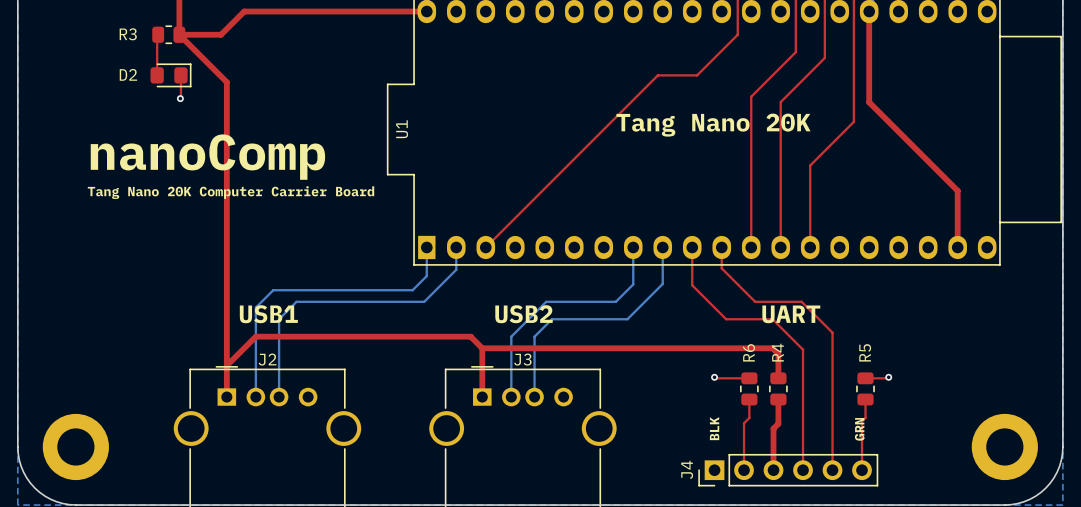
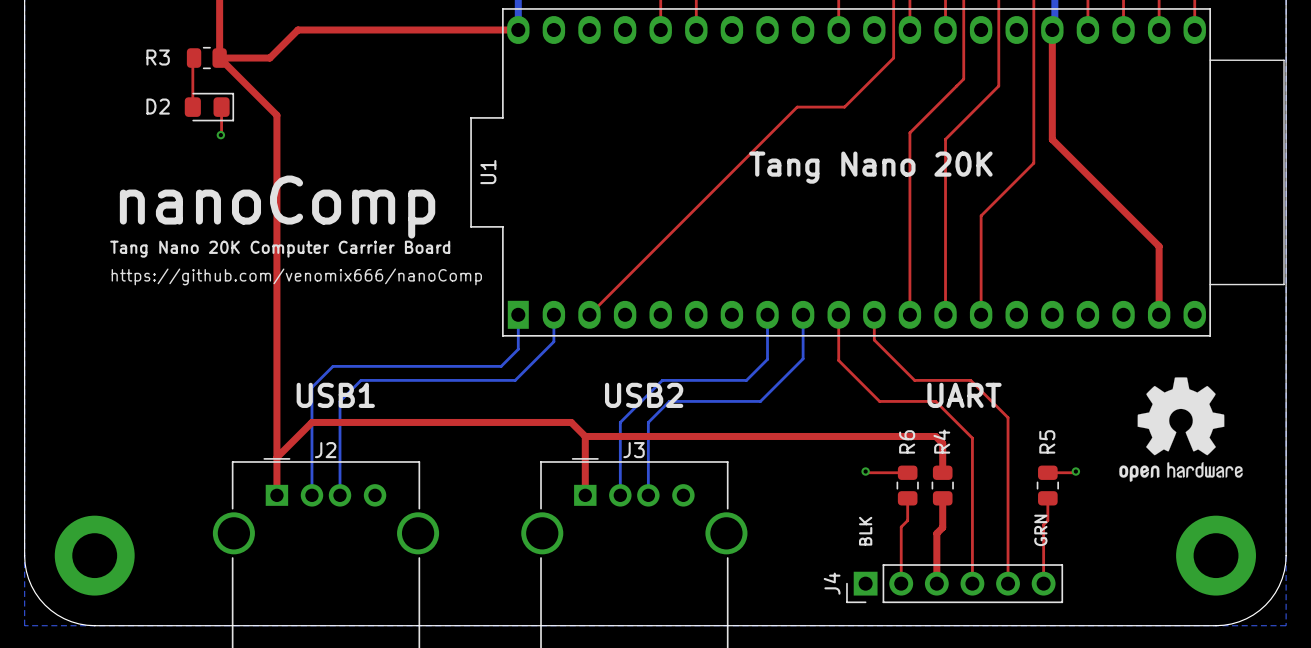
text: none -> https://github.com/venomix666/nanoComp (296, 276)
drawing: none -> [1119, 377, 1243, 482]

